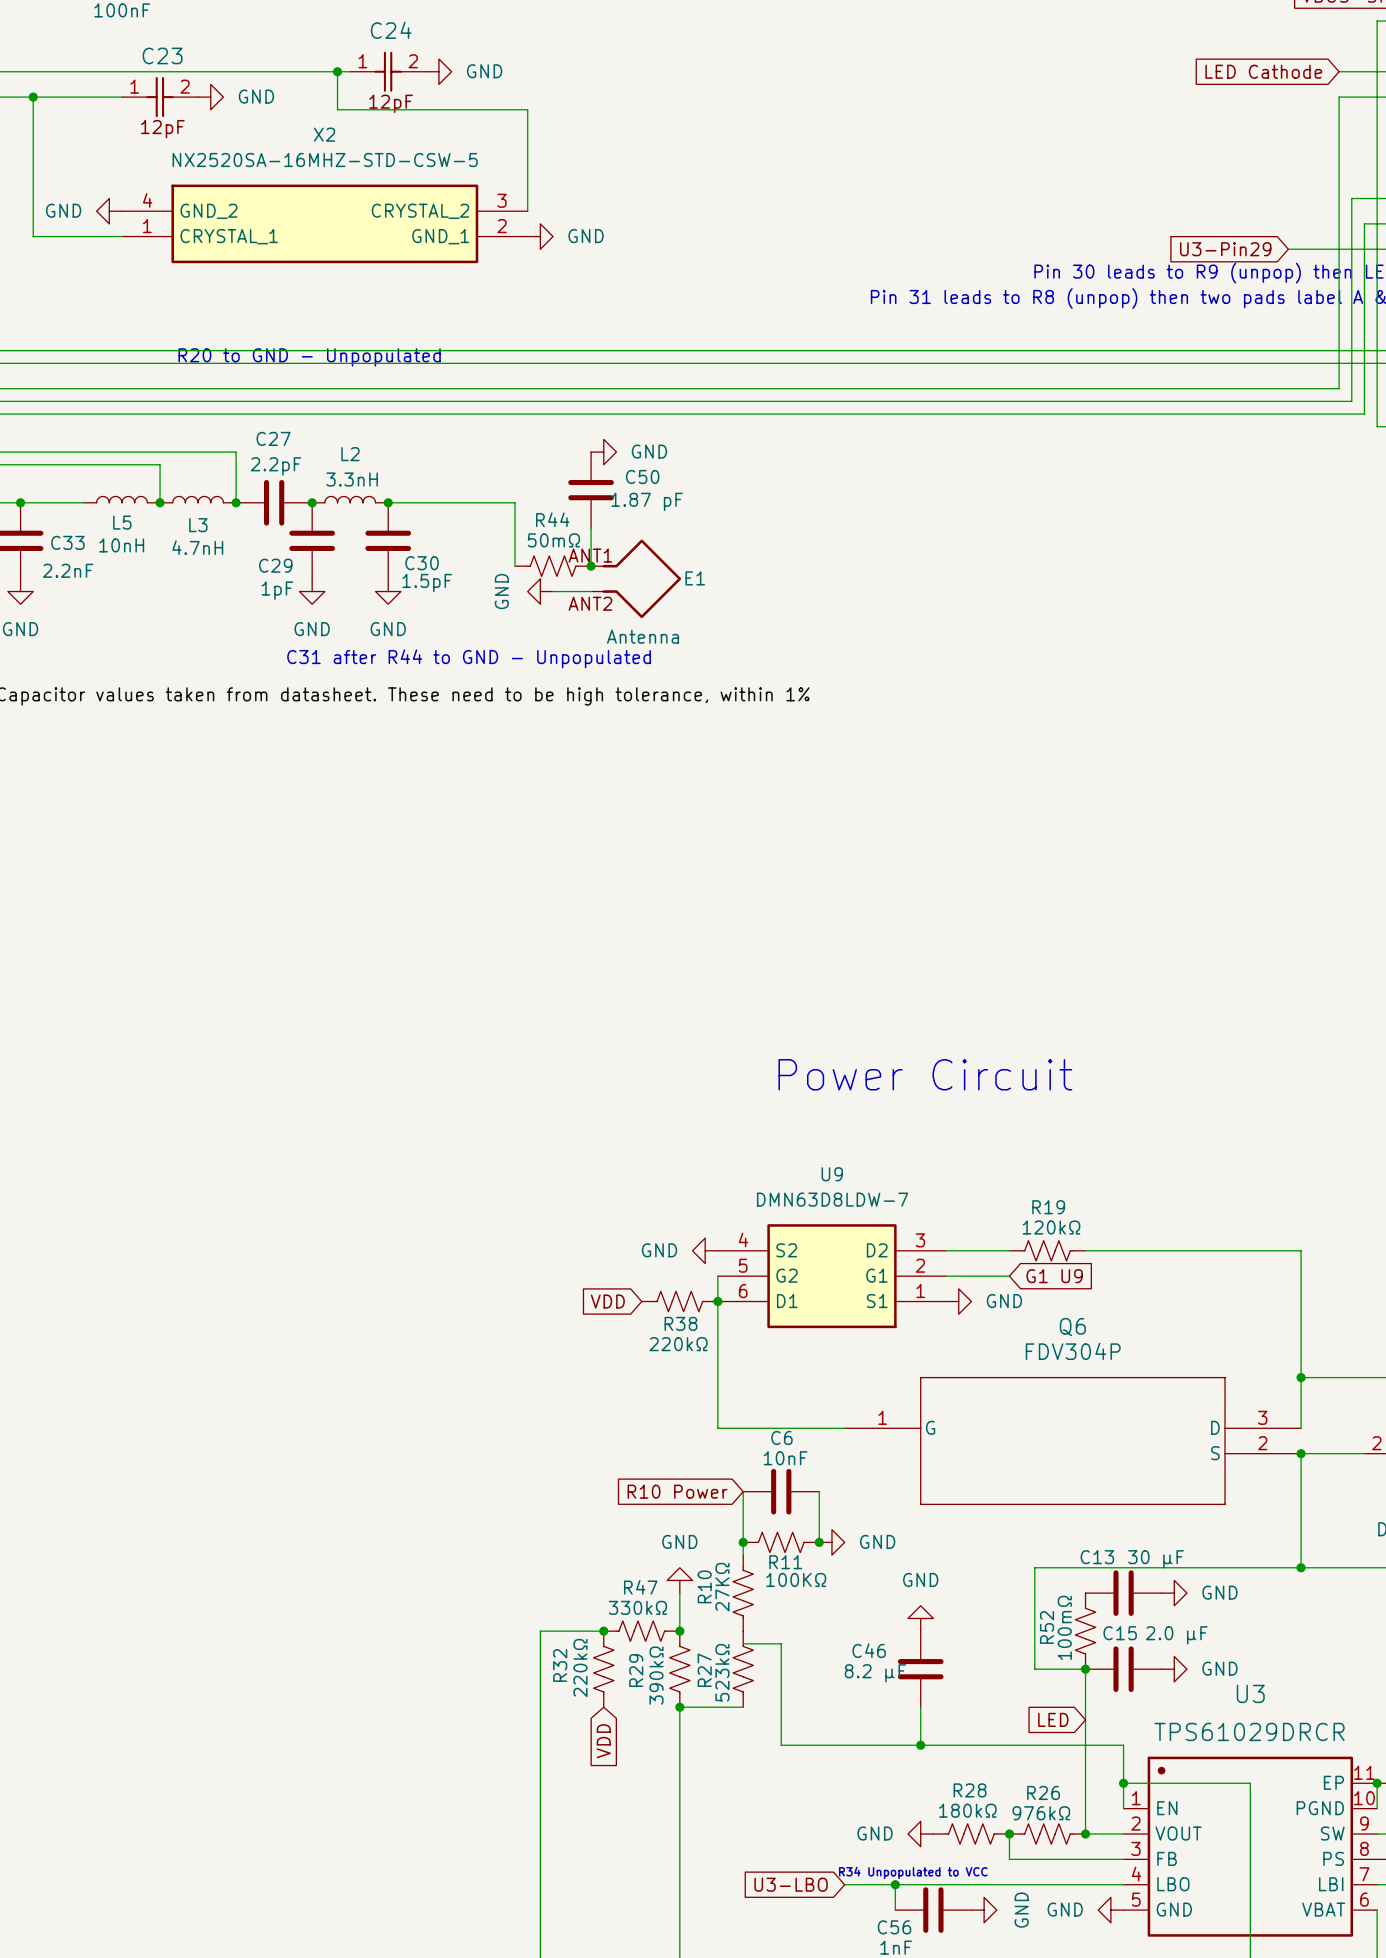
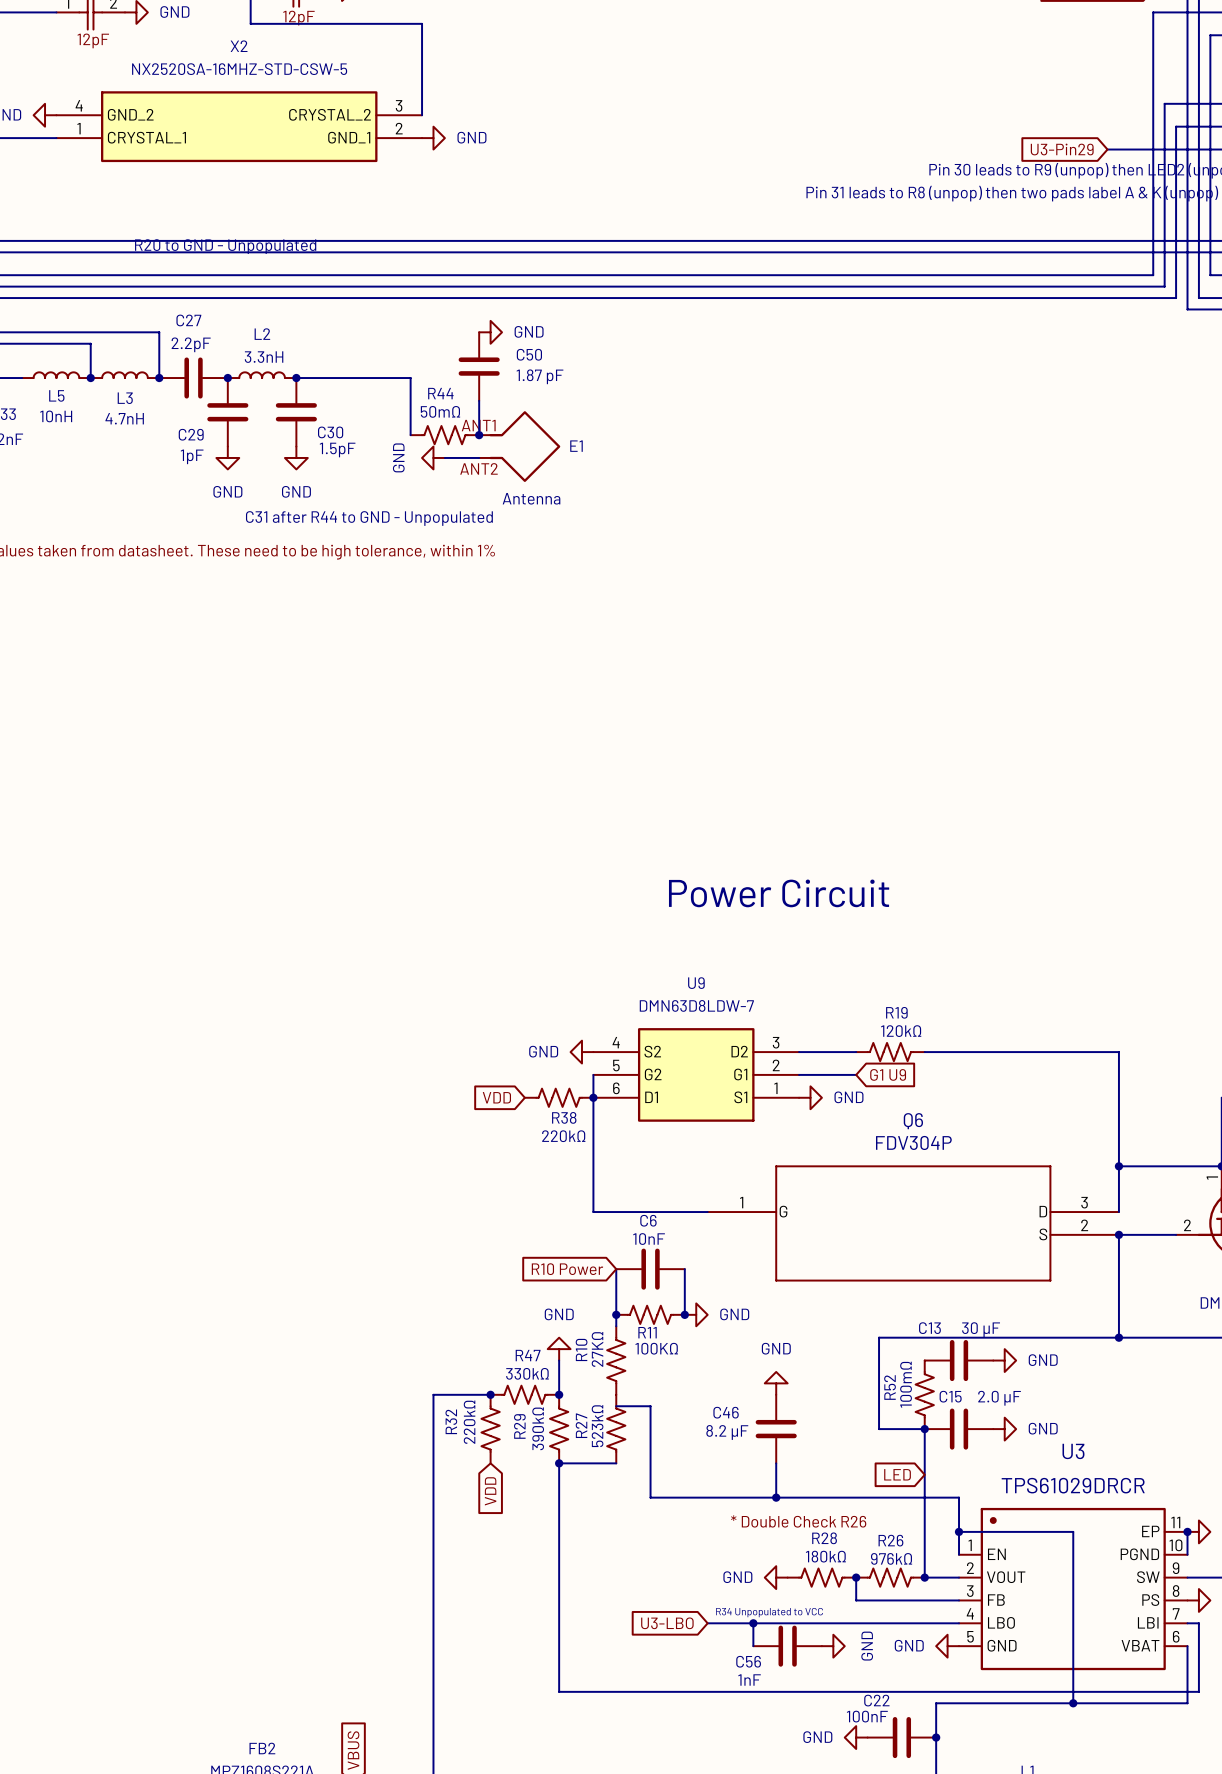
label: none -> * Double Check R26 (798, 1521)

